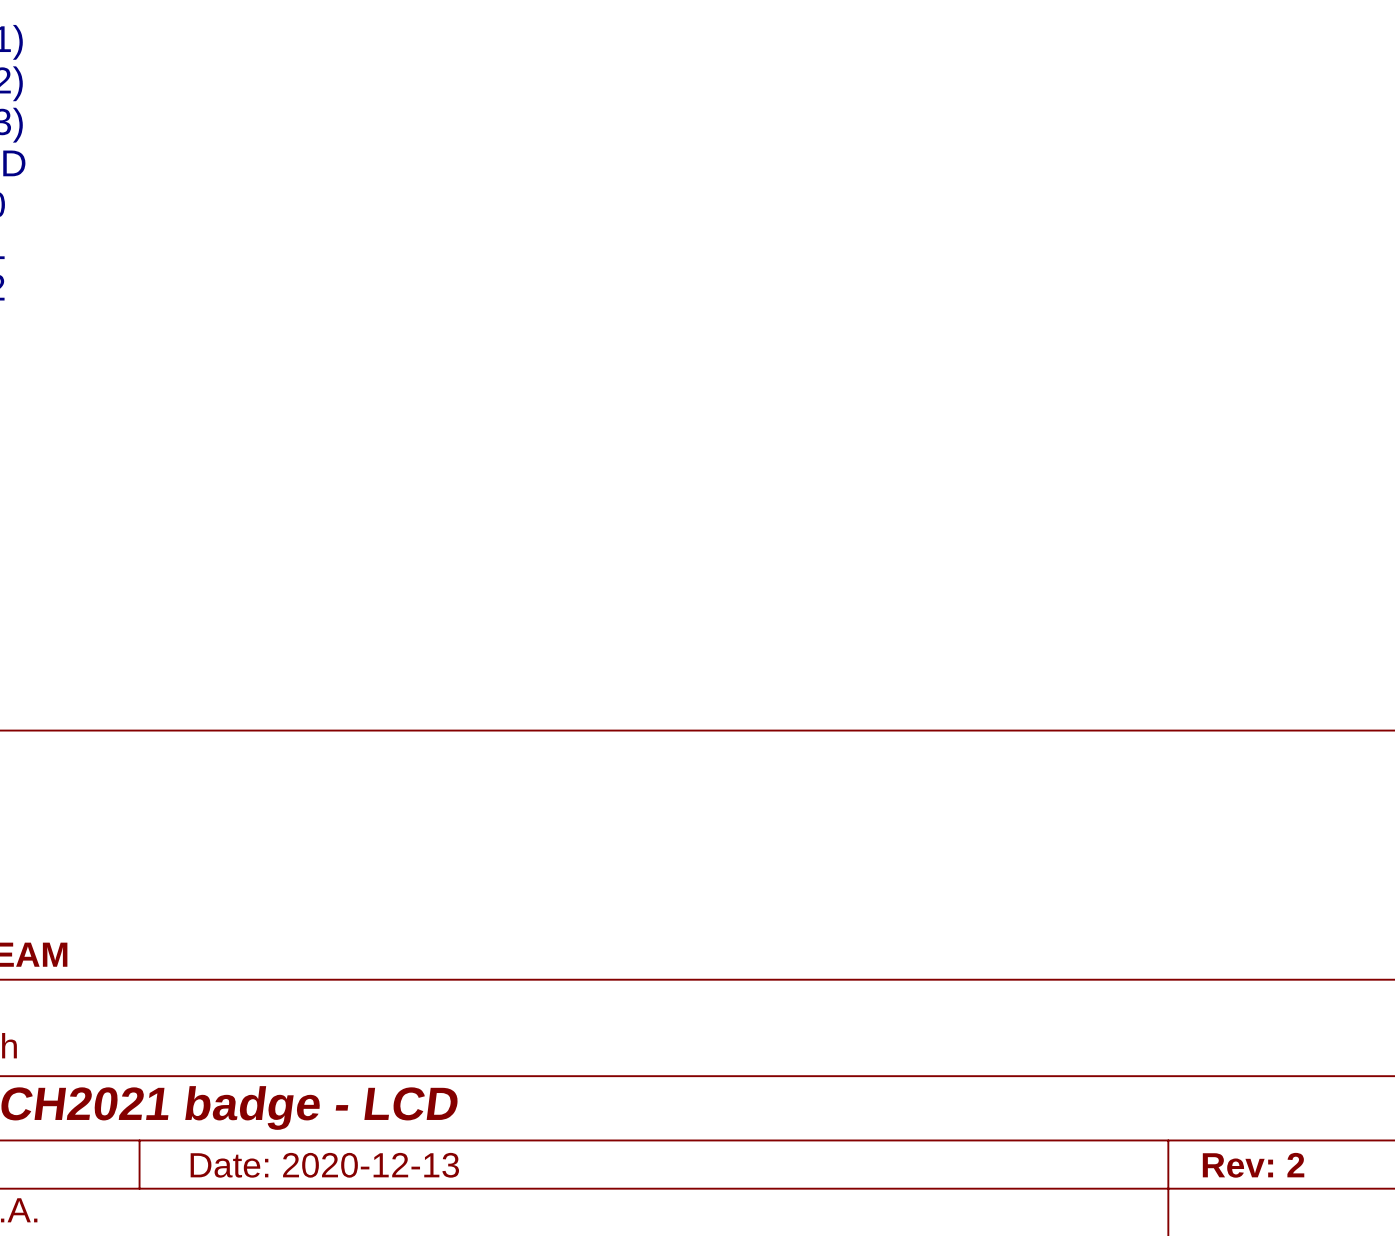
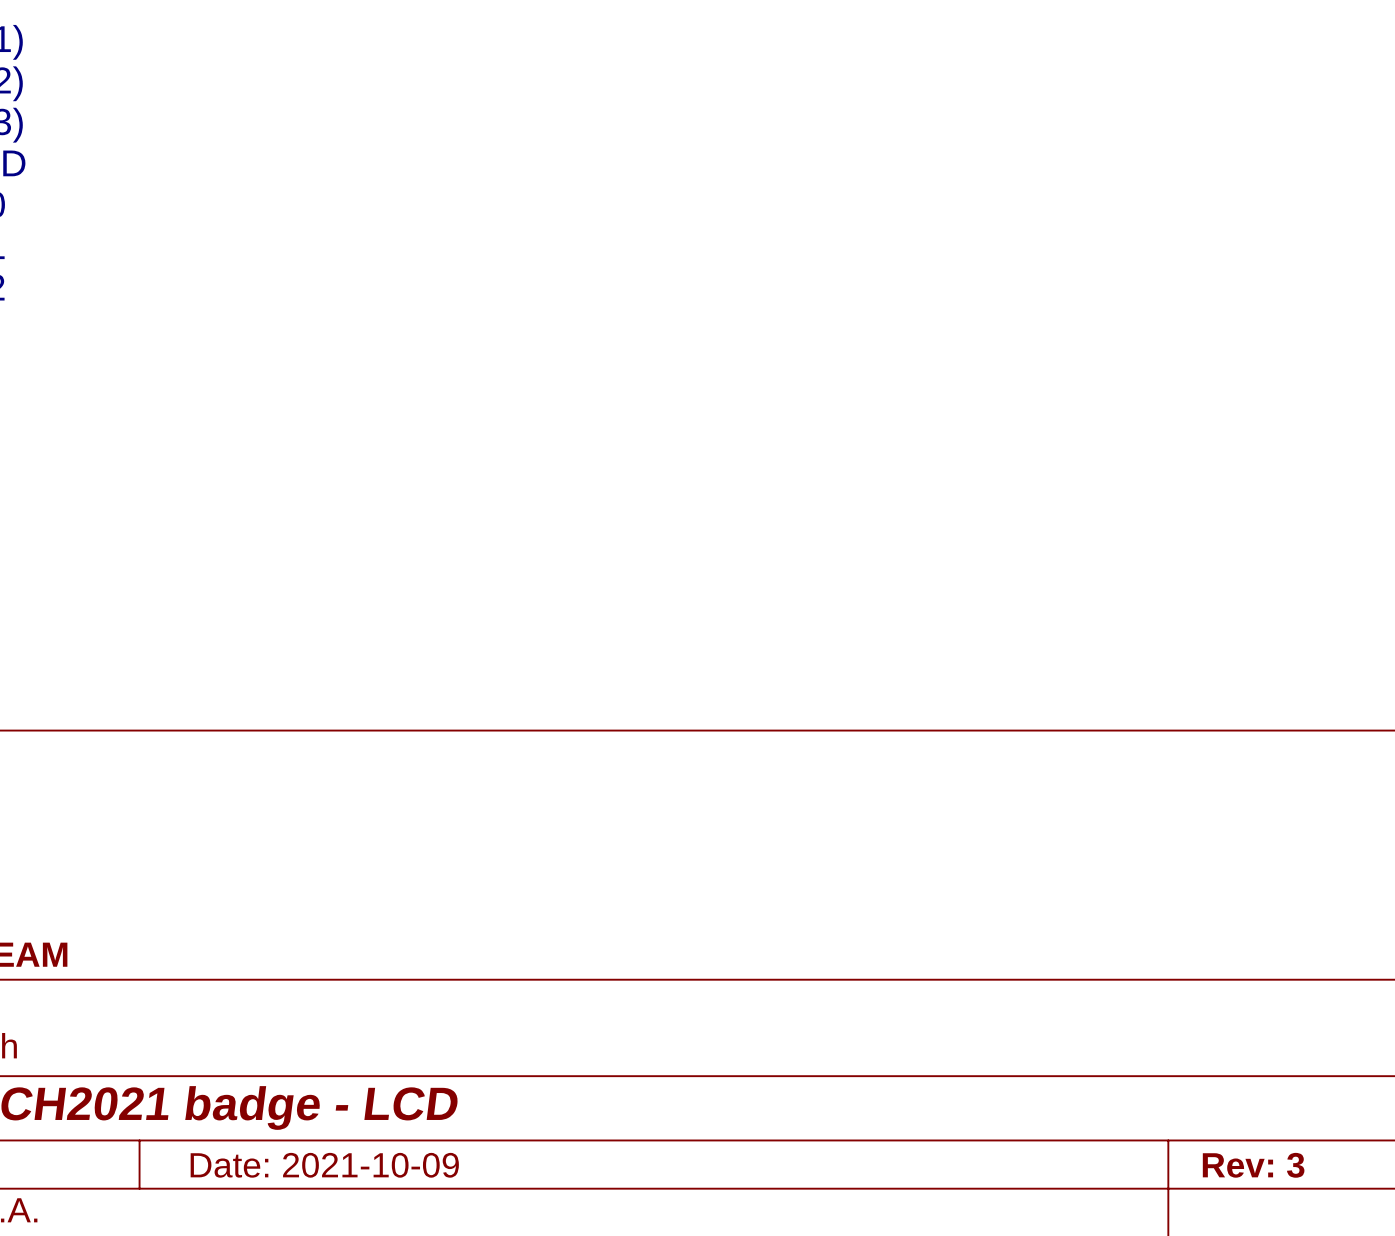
title block: Date: 2020-12-13 (324, 1165) -> Date: 2021-10-09 (324, 1165)
title block: Rev: 2 (1253, 1165) -> Rev: 3 (1253, 1165)

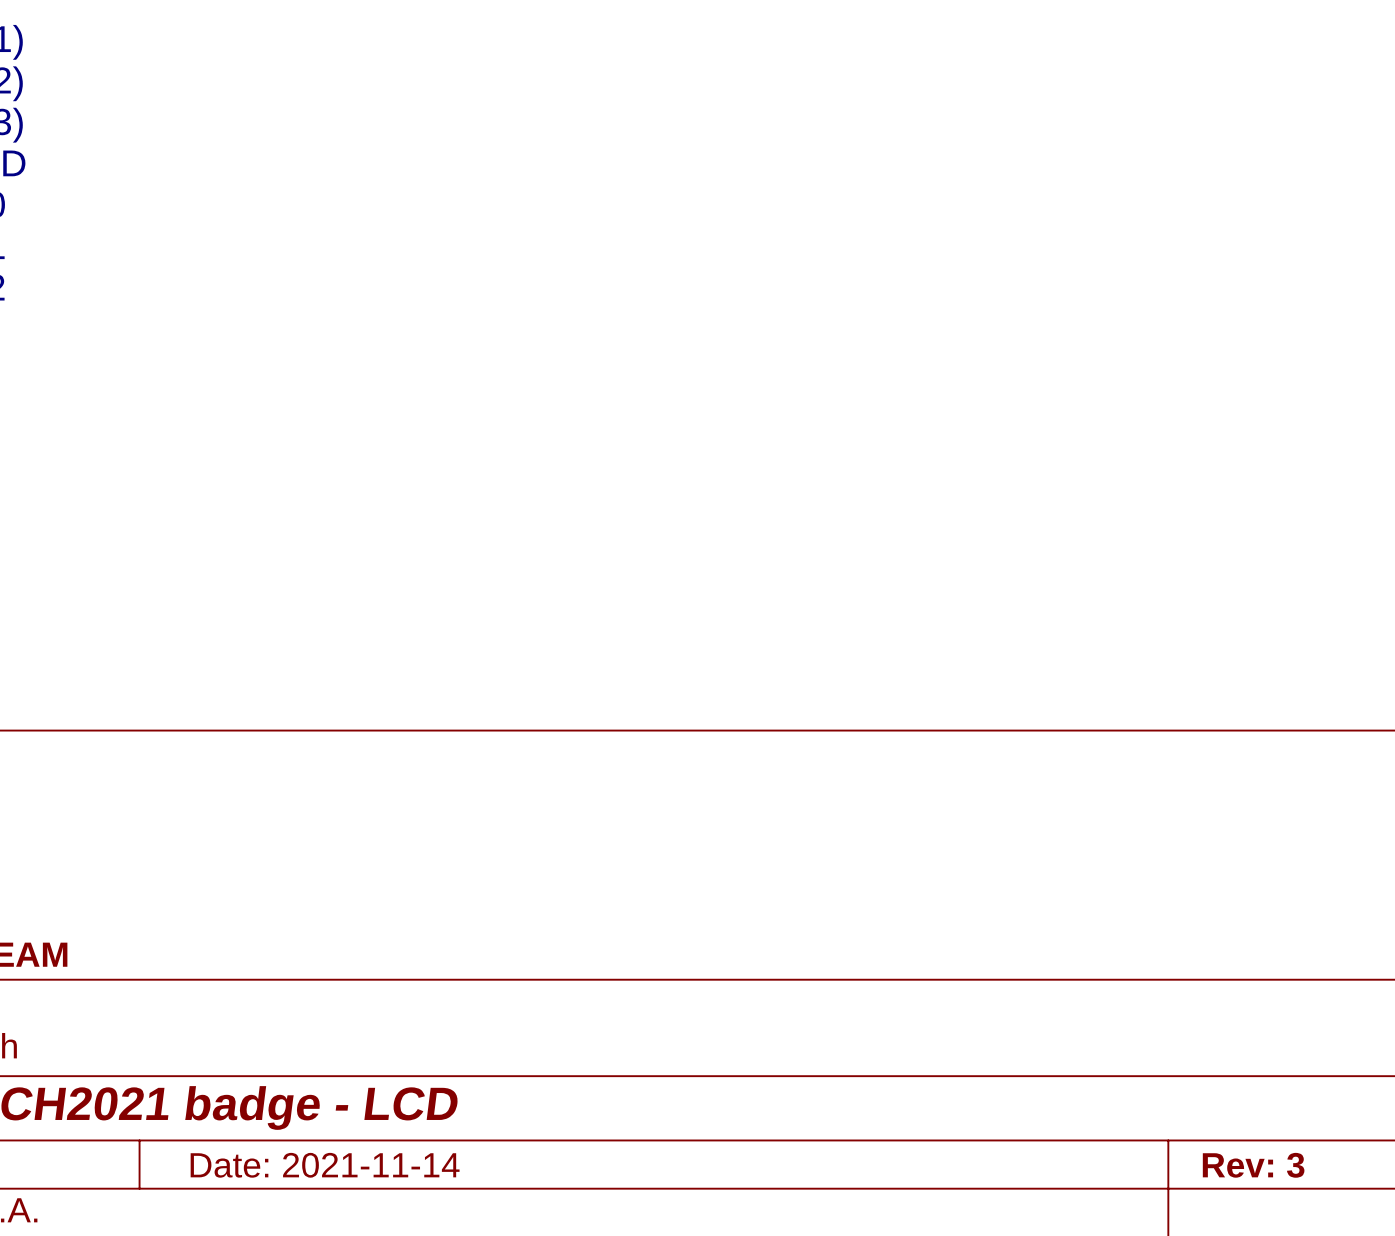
title block: Date: 2021-10-09 (324, 1165) -> Date: 2021-11-14 (325, 1165)

